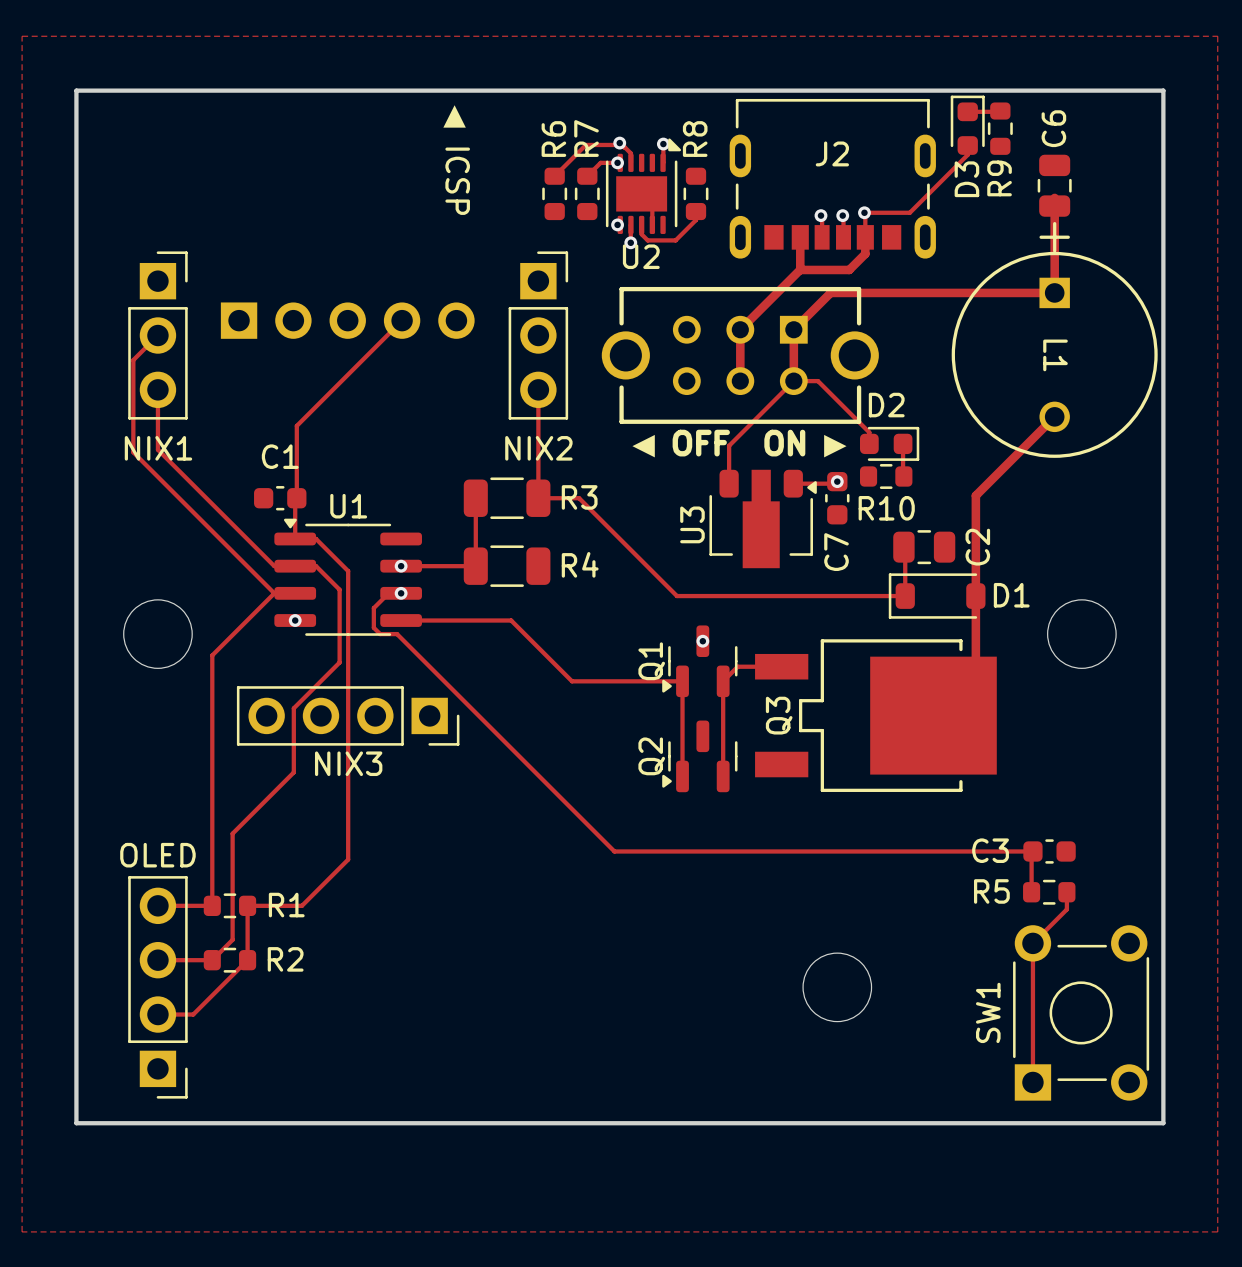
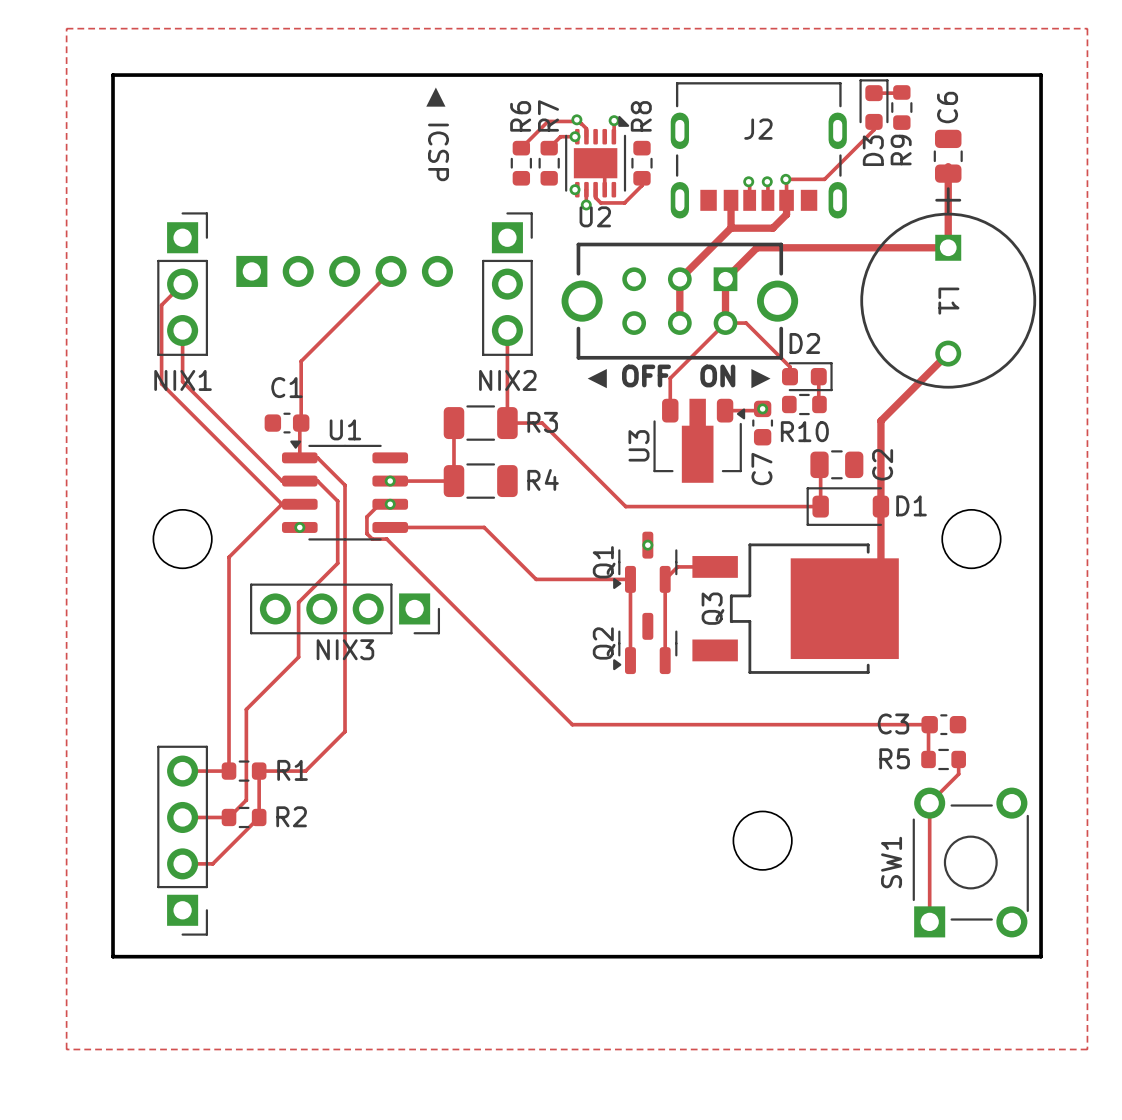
part value: OLED (157, 855) -> none

